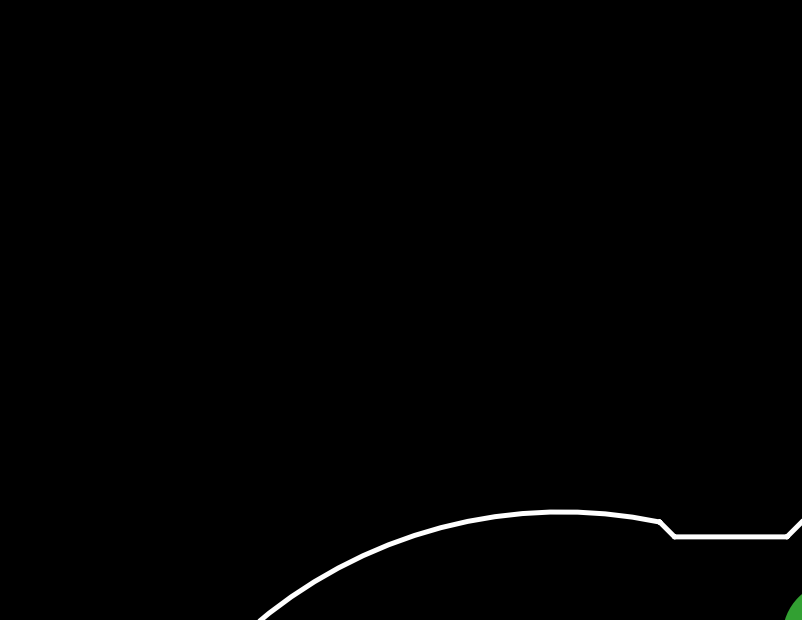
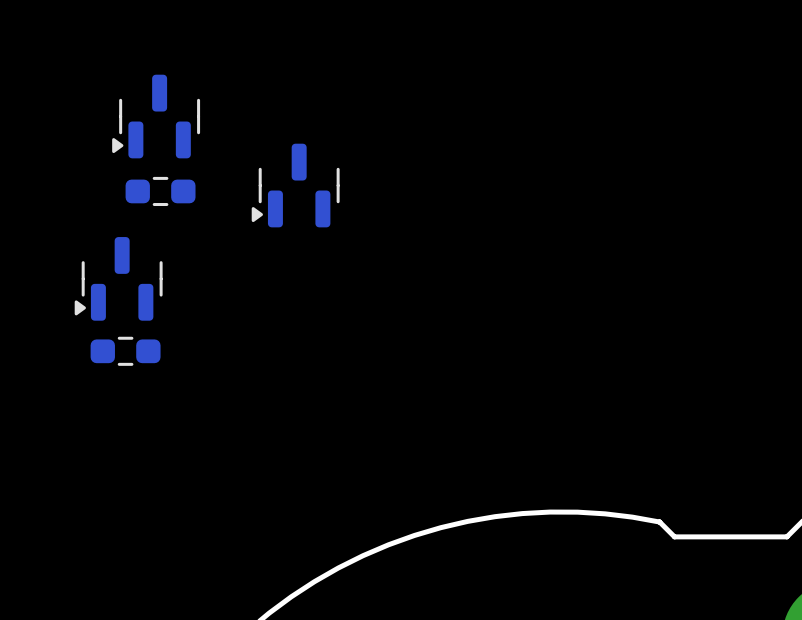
part: none -> (156, 116)
part: none -> (295, 185)
part: none -> (160, 191)
part: none -> (118, 278)
part: none -> (125, 351)

